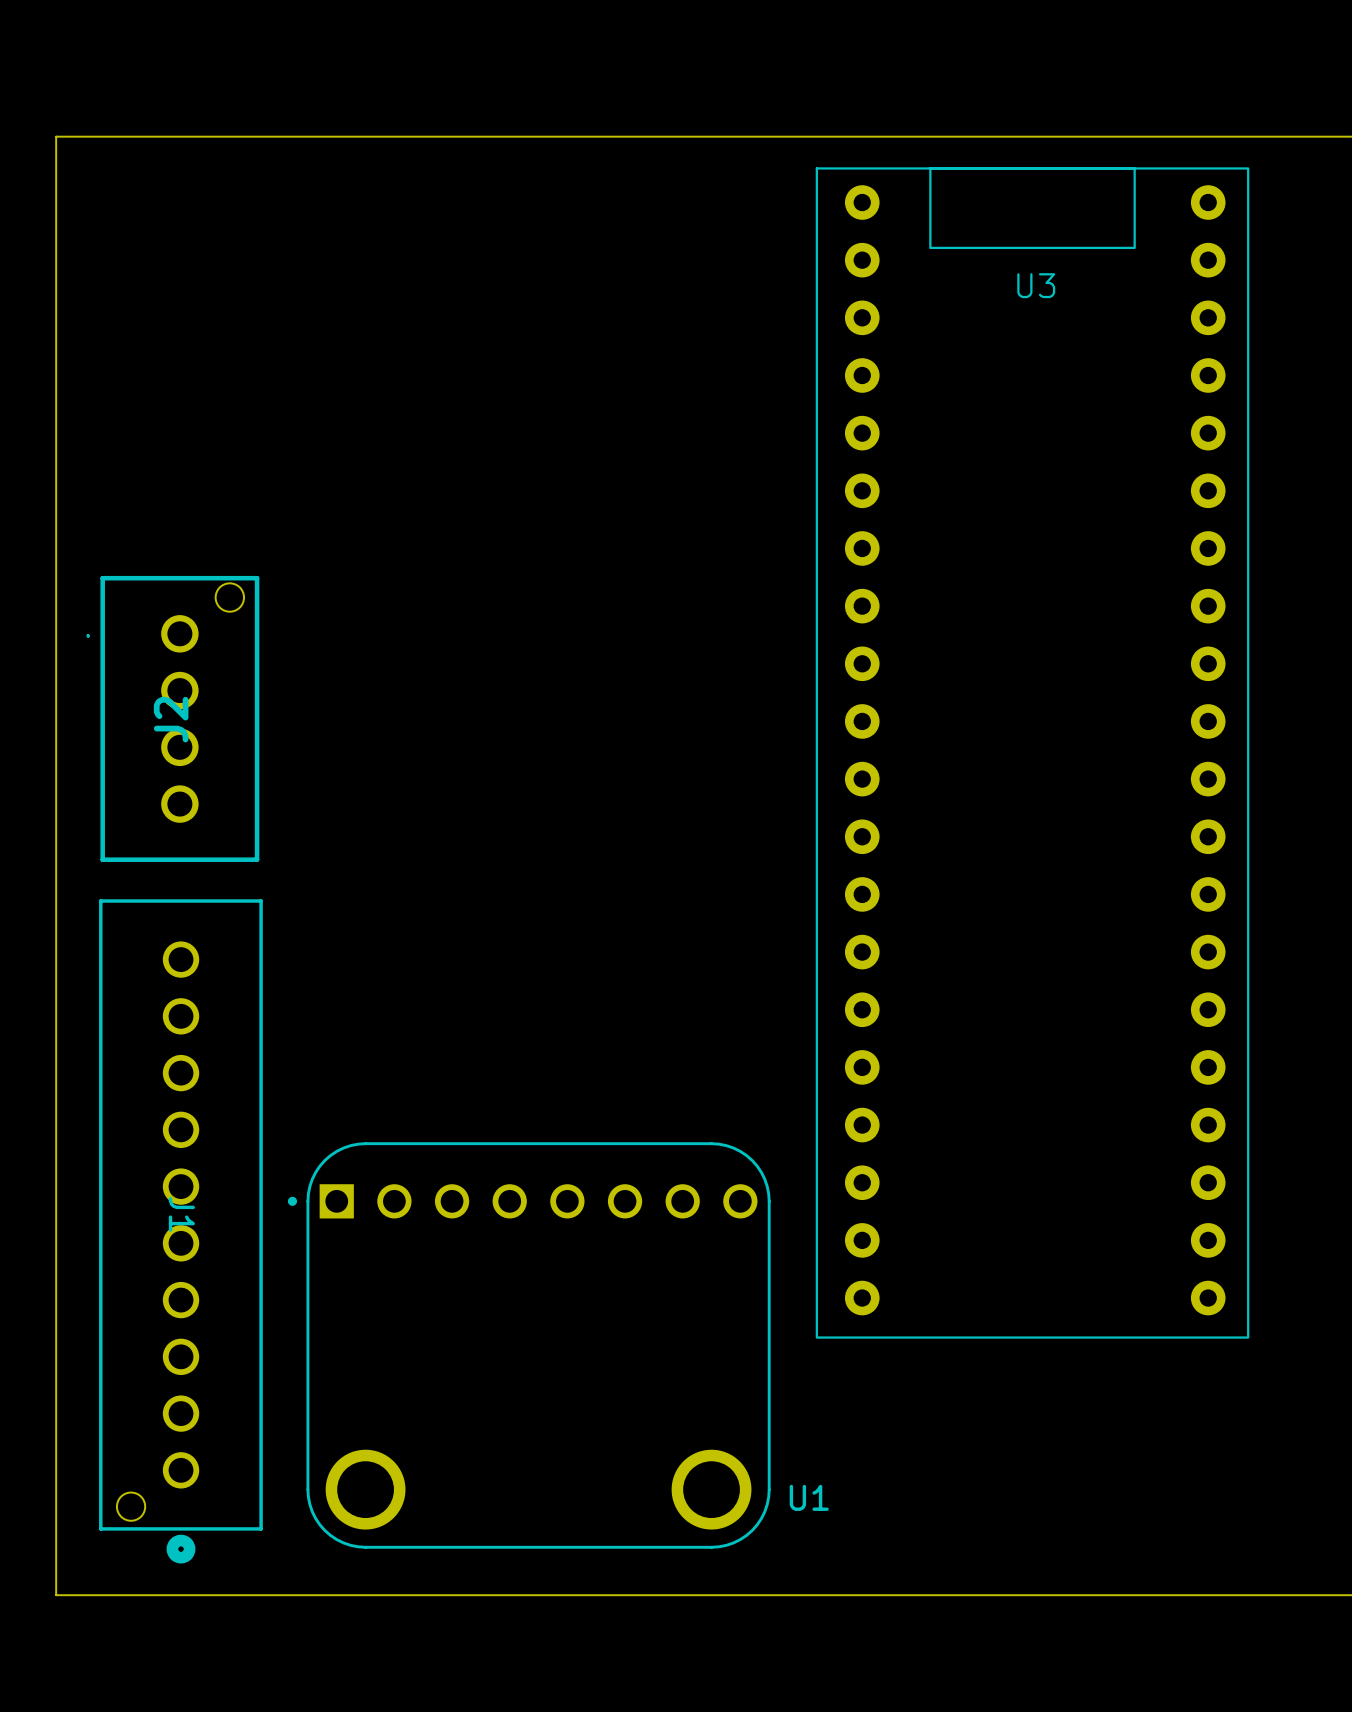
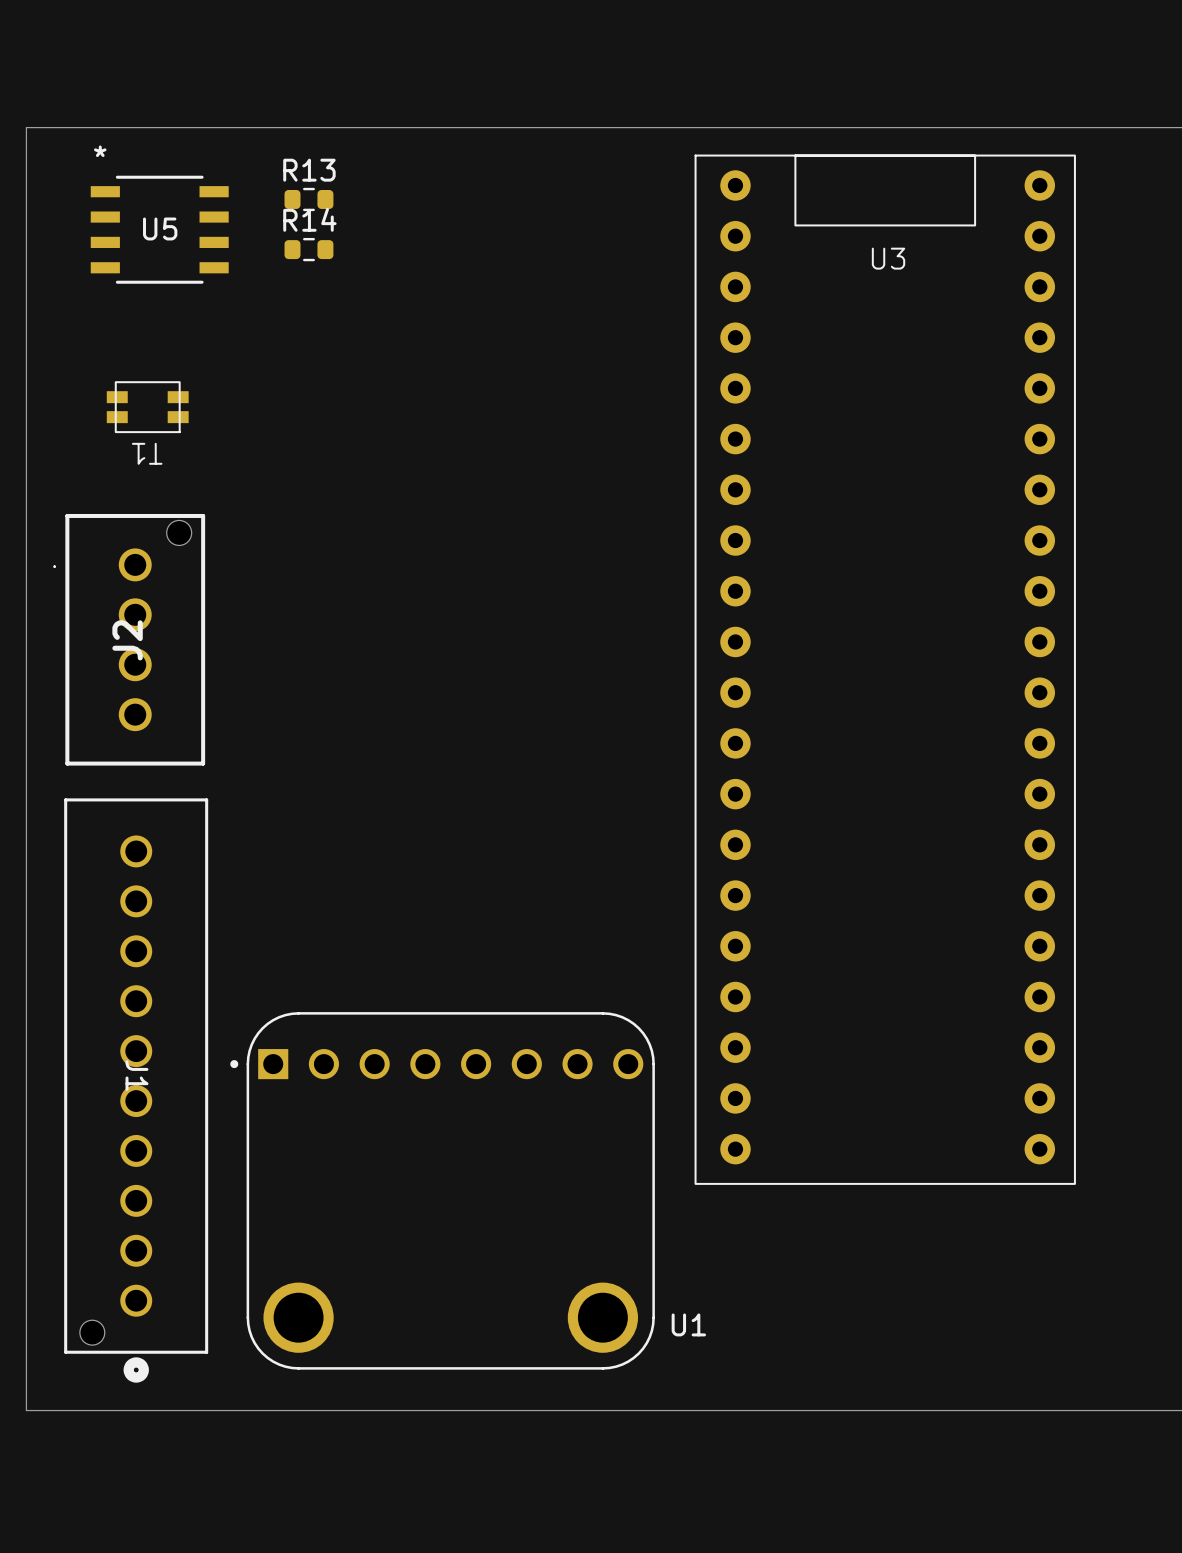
R13: none -> (308, 199)
U5: none -> (159, 229)
R14: none -> (308, 249)
T1: none -> (147, 407)

